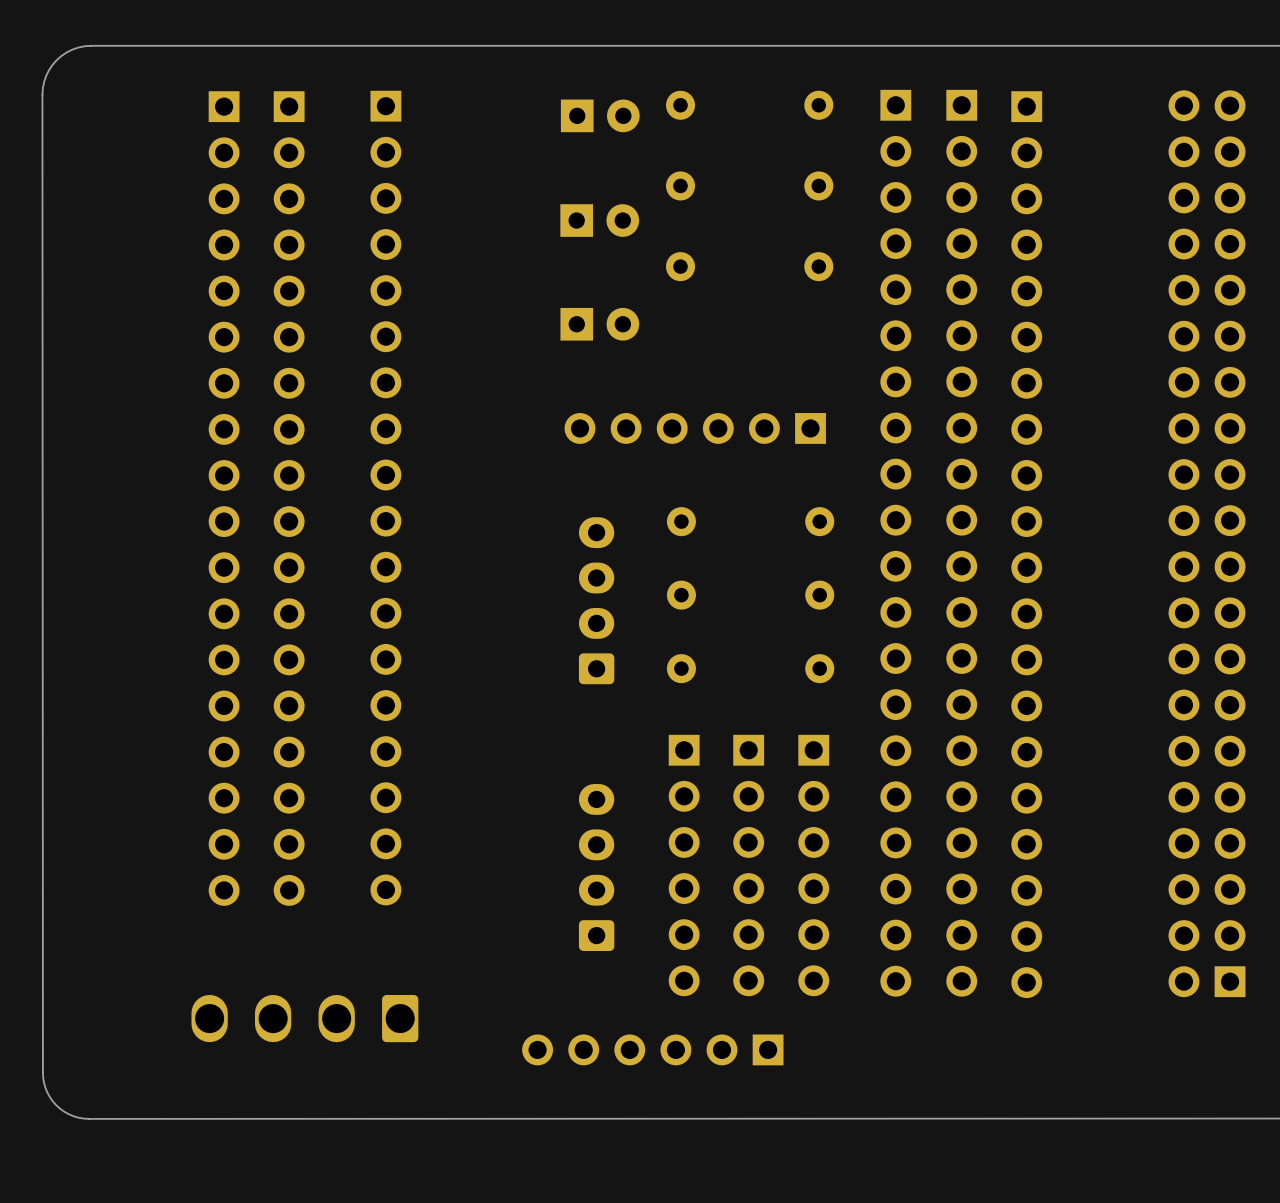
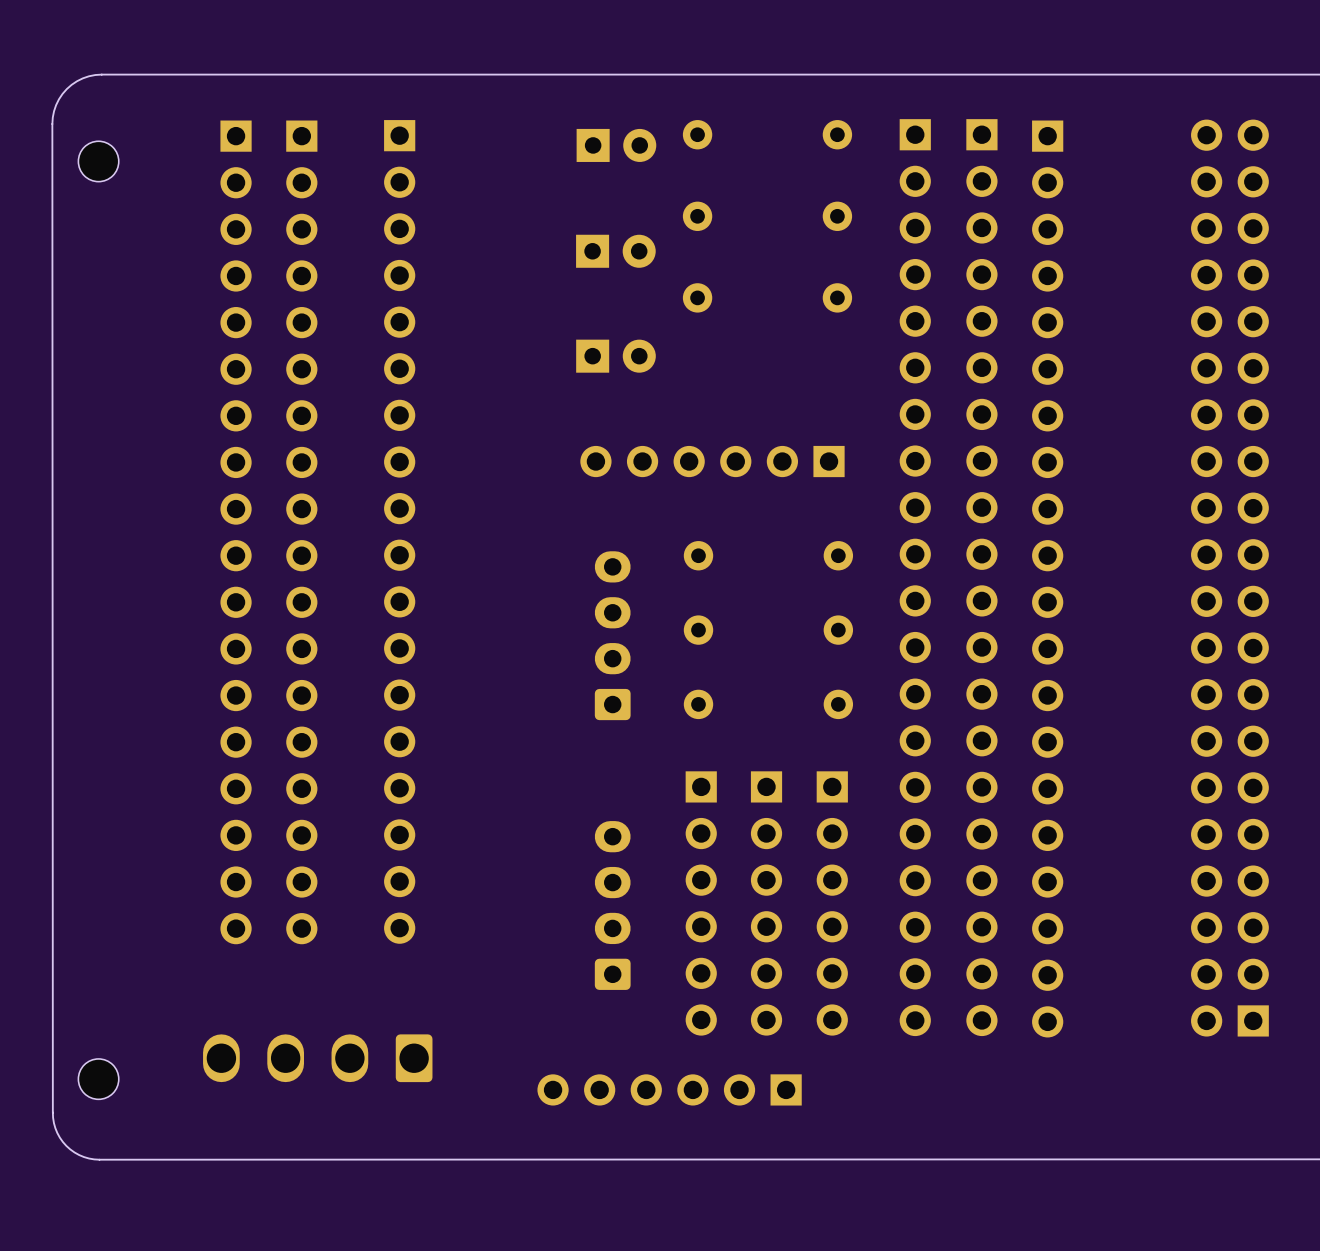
part: none -> (98, 161)
part: none -> (98, 1079)

